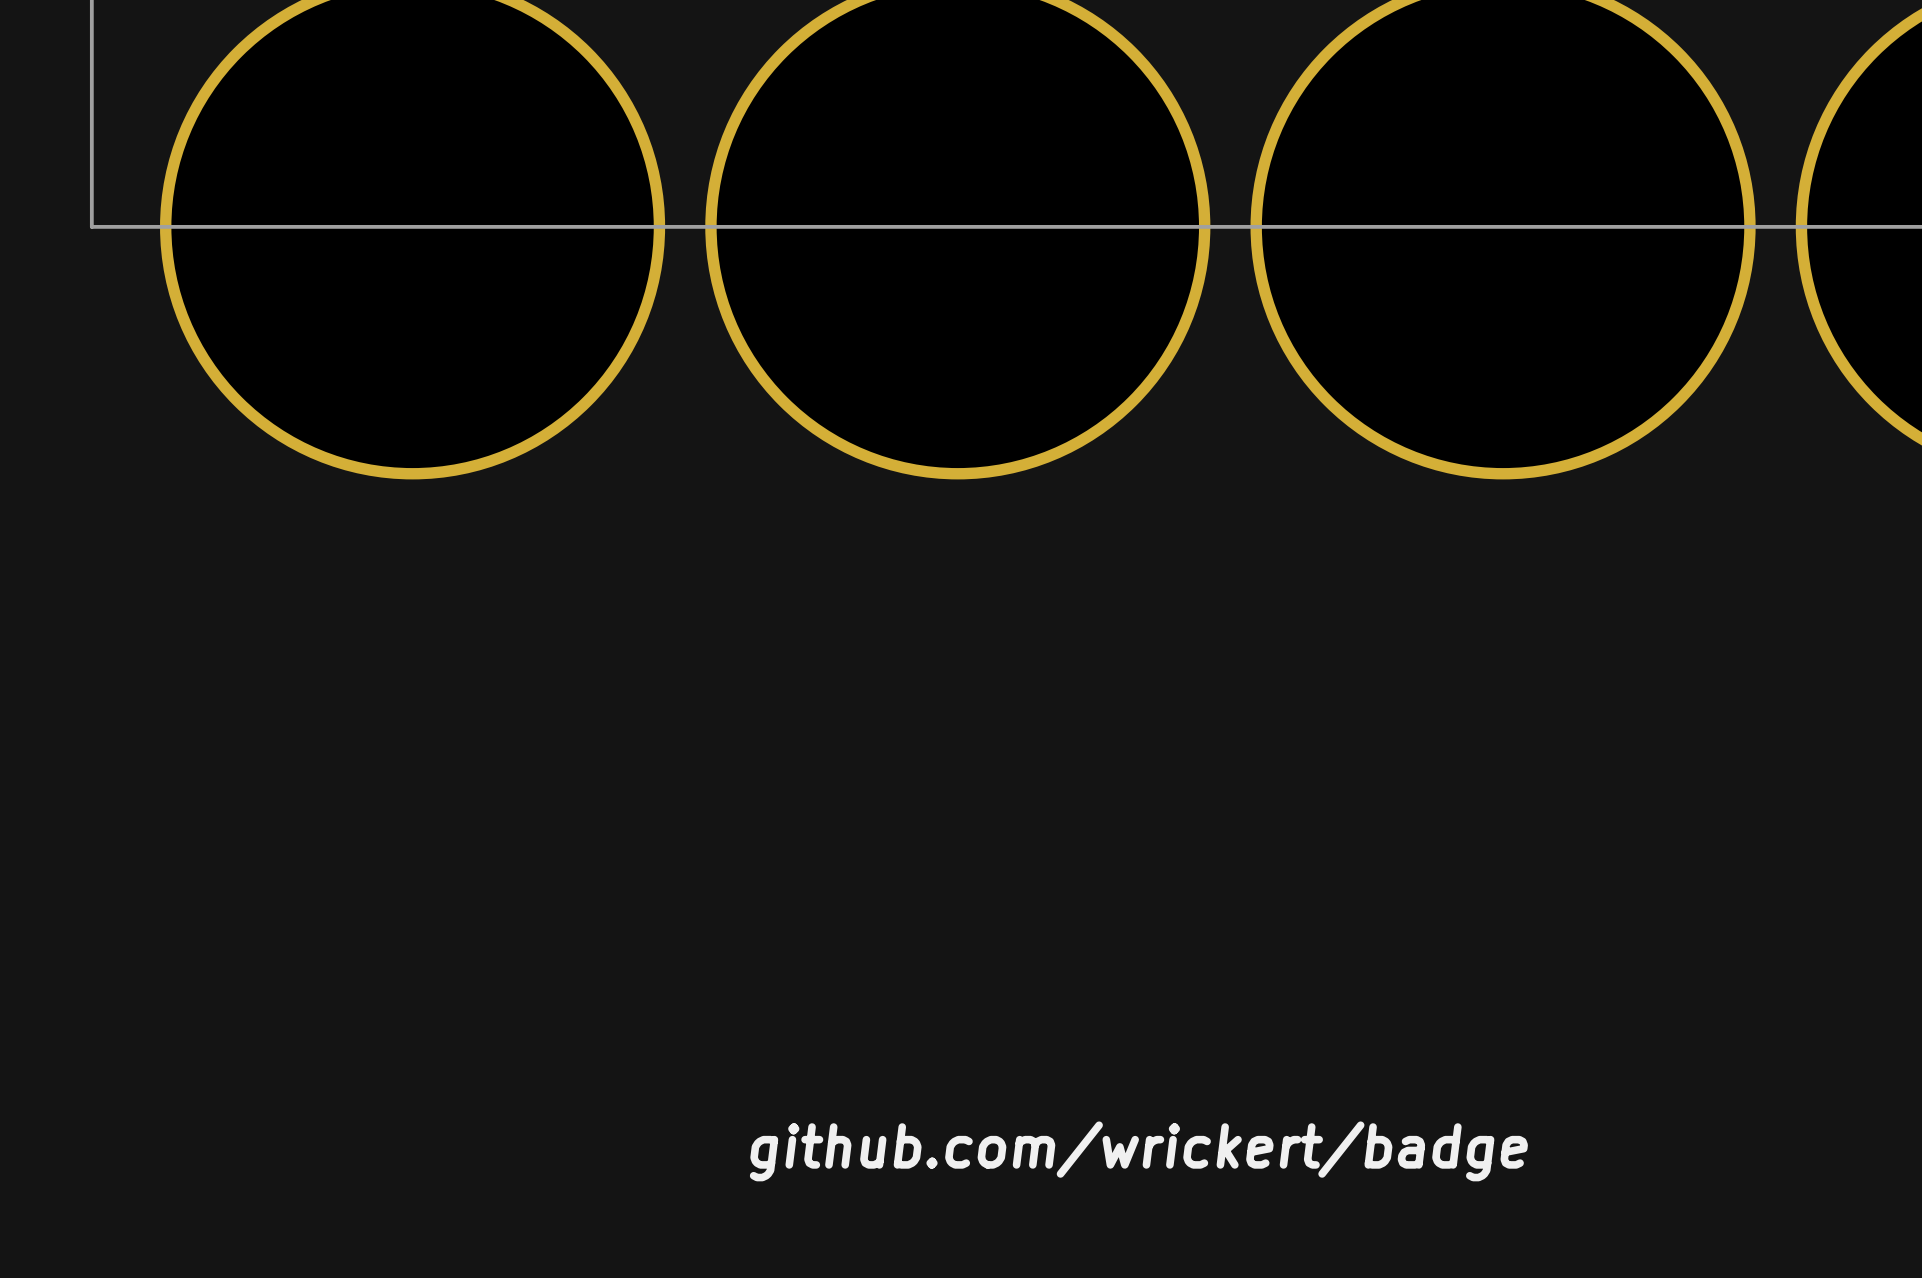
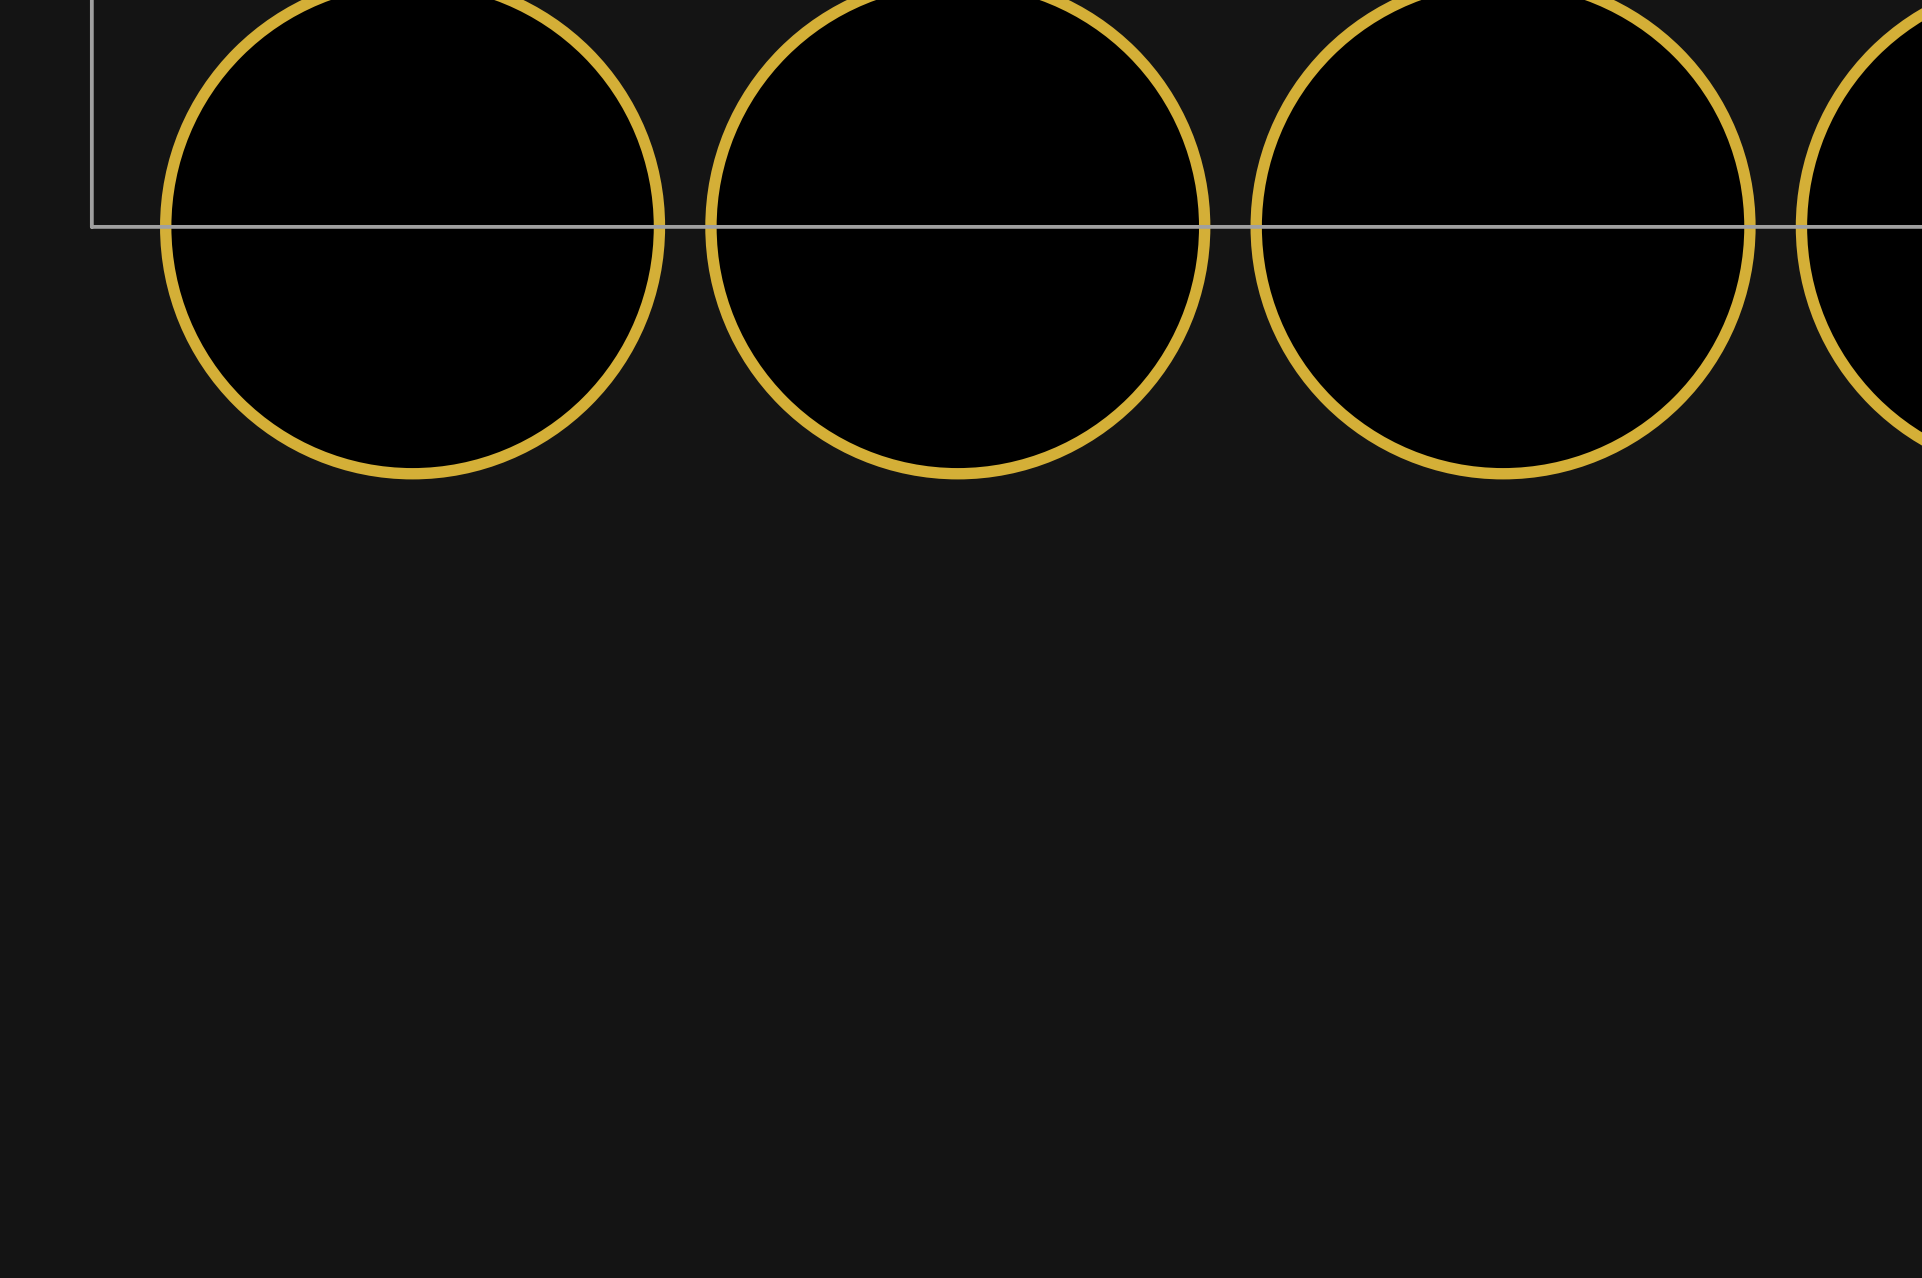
text: github.com/wrickert/badge (1138, 1151) -> none

